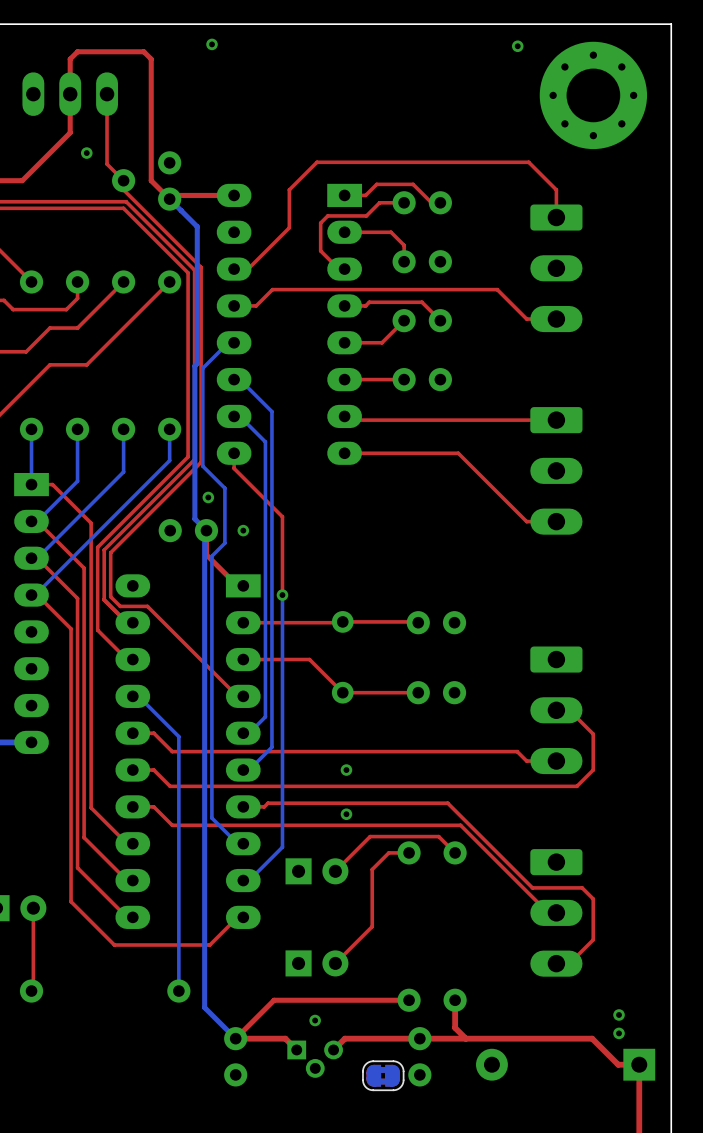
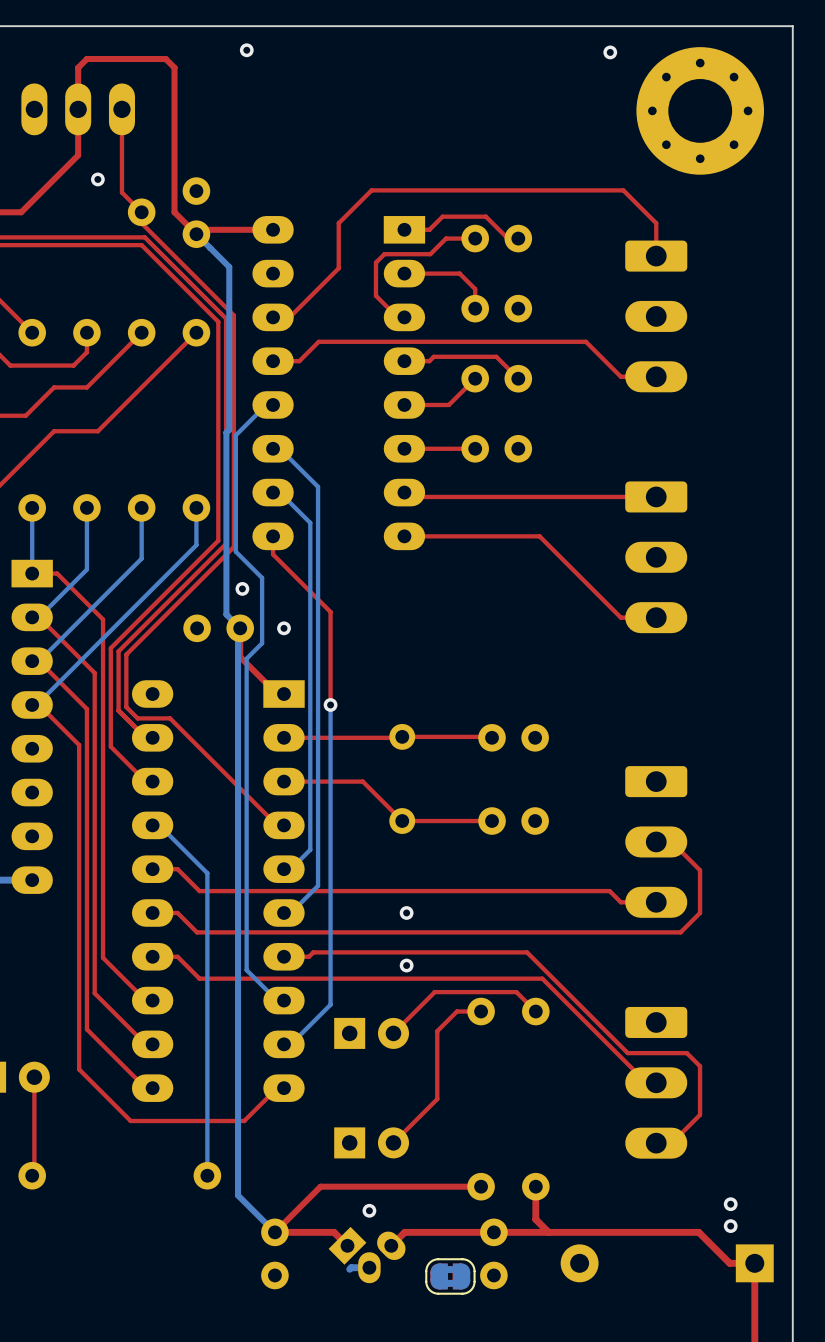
part footprint: [287, 1040, 343, 1078] -> [328, 1226, 406, 1284]
bottom track: none -> (369, 1267) (349, 1269)

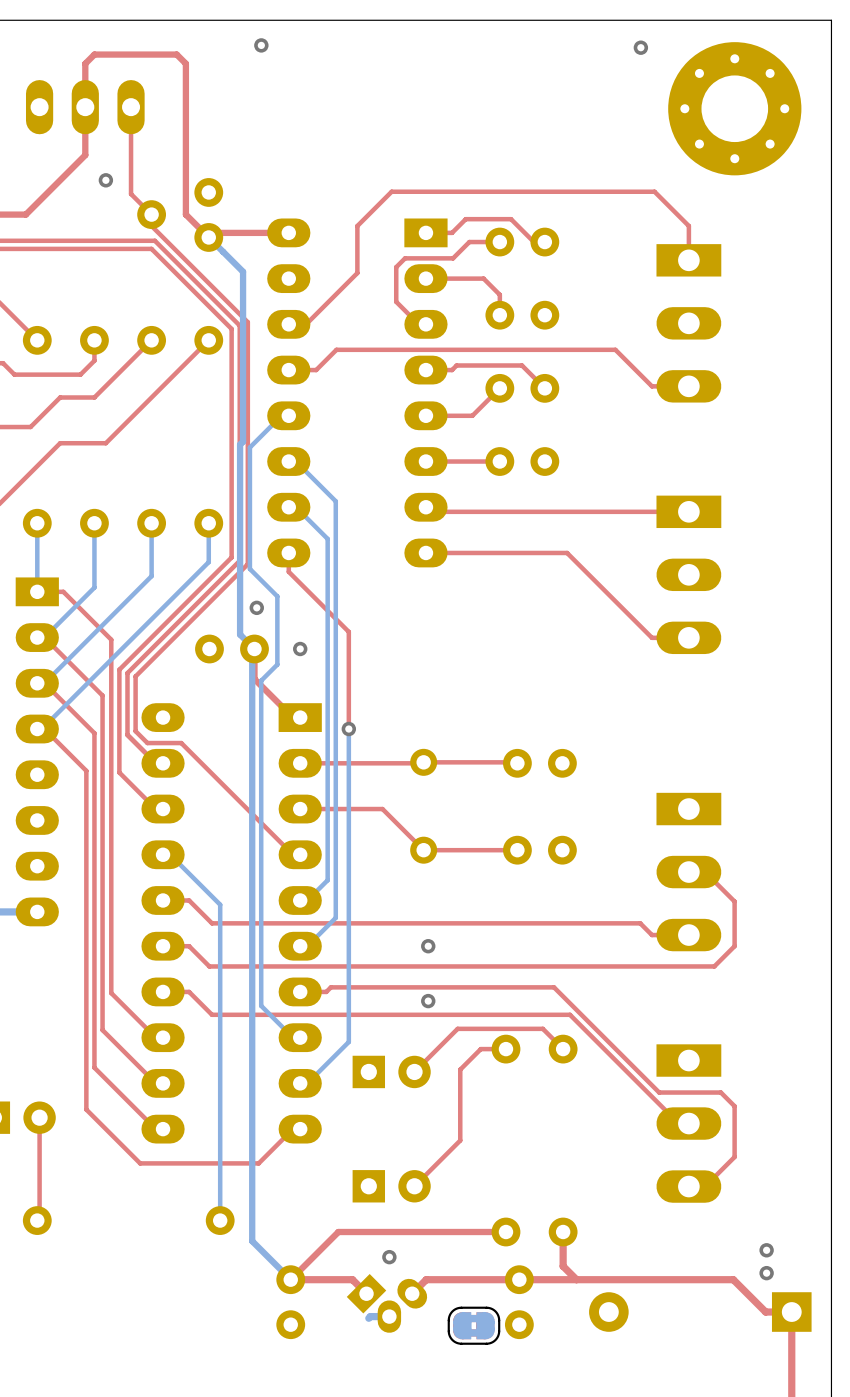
part footprint: [625, 240, 688, 393] -> [656, 244, 722, 403]
part footprint: [625, 481, 688, 634] -> [656, 495, 722, 655]
part footprint: [625, 766, 688, 918] -> [656, 792, 722, 952]
part footprint: [625, 1006, 688, 1159] -> [656, 1044, 722, 1203]

